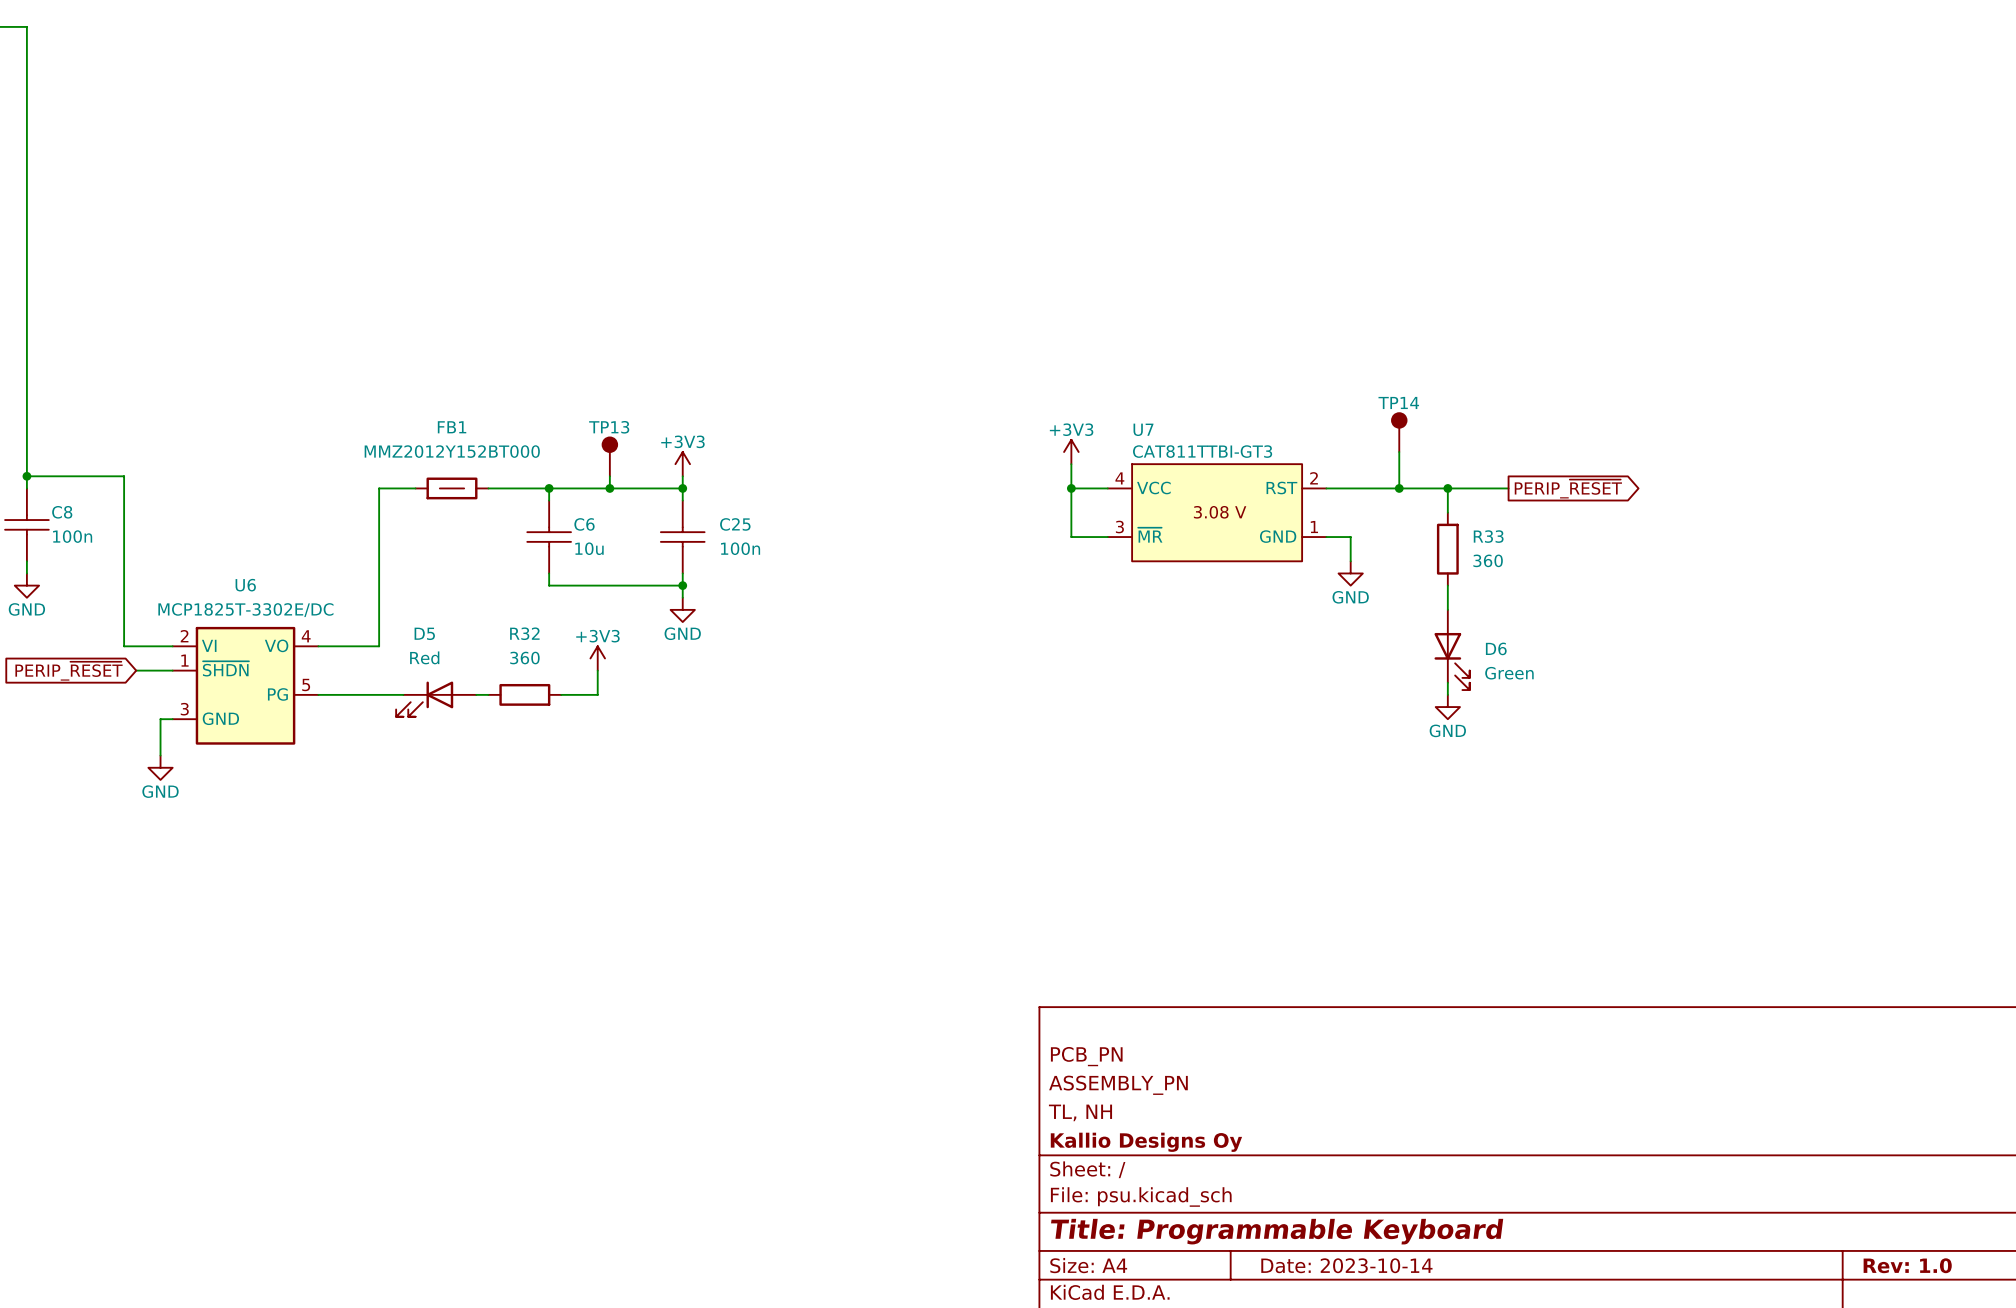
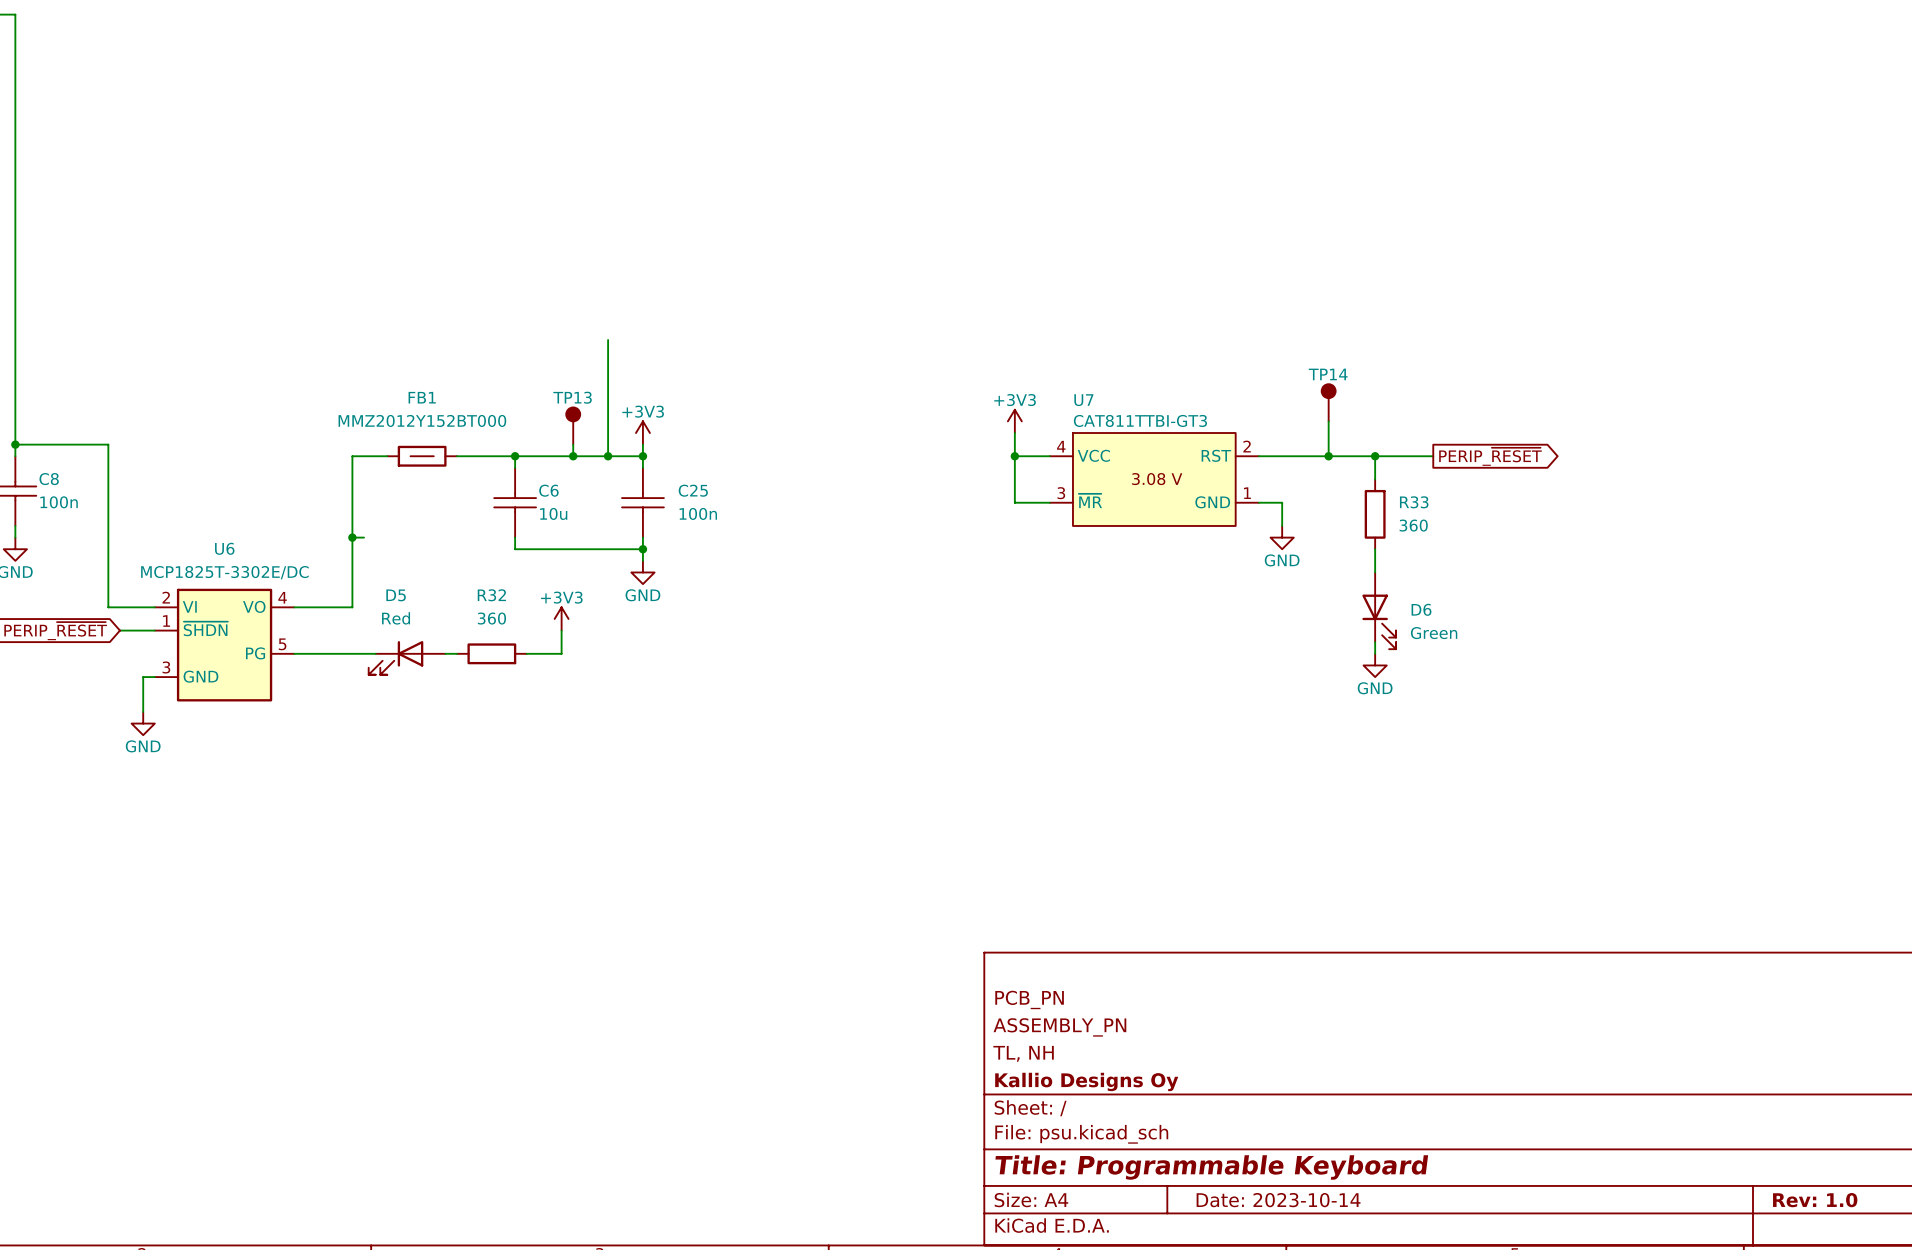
wire: none -> (608, 340) (608, 456)
junction: none -> (608, 456)
wire: none -> (352, 537) (364, 537)
junction: none -> (352, 537)

